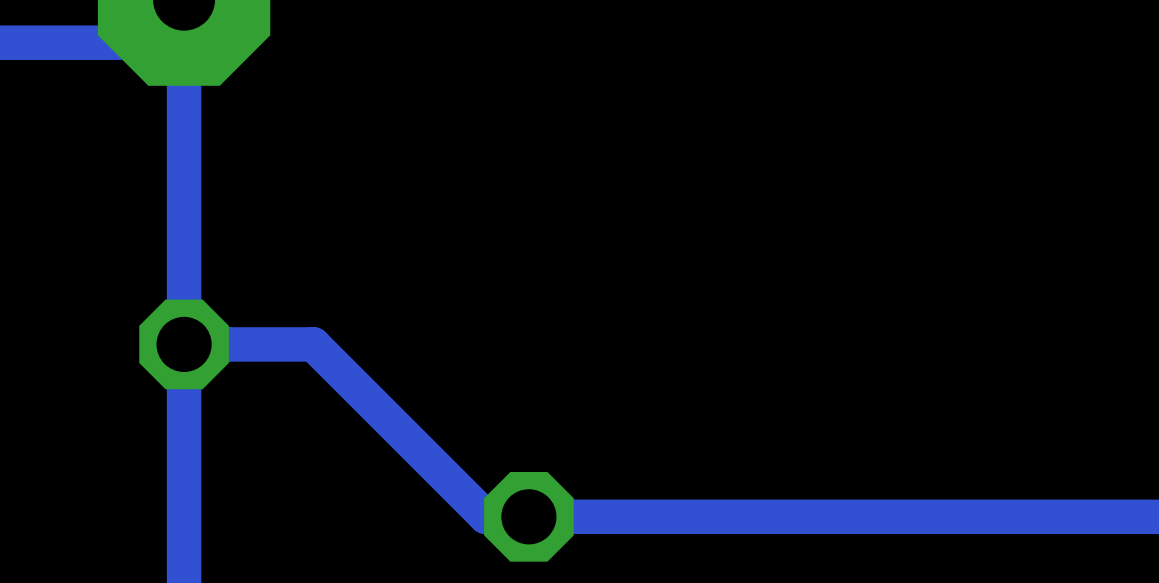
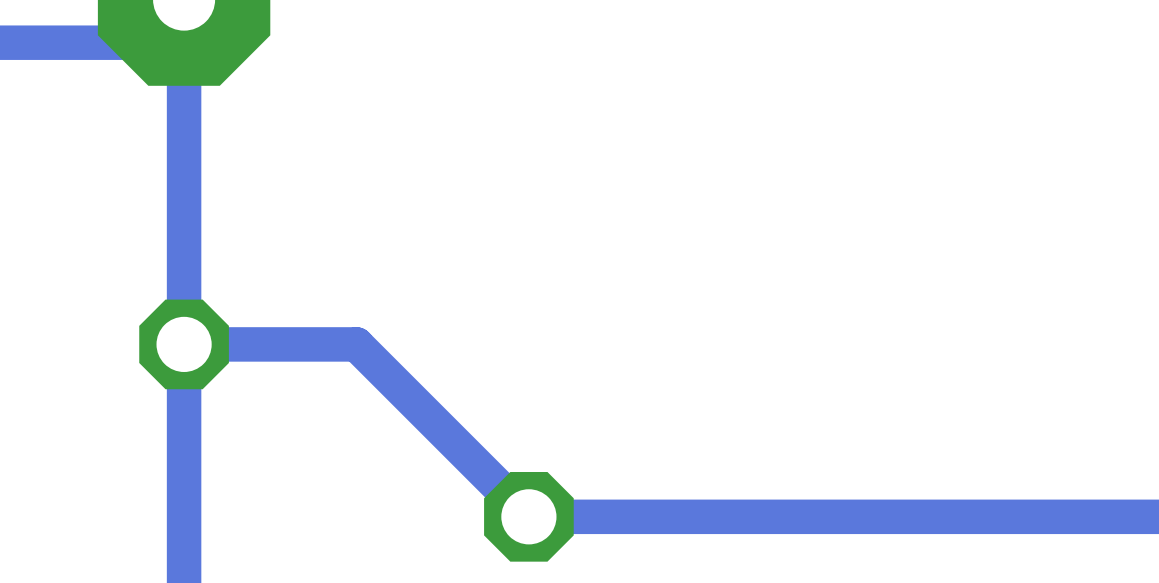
track: (313, 344) (485, 516) (528, 516) -> (313, 344) (356, 344) (528, 516)

